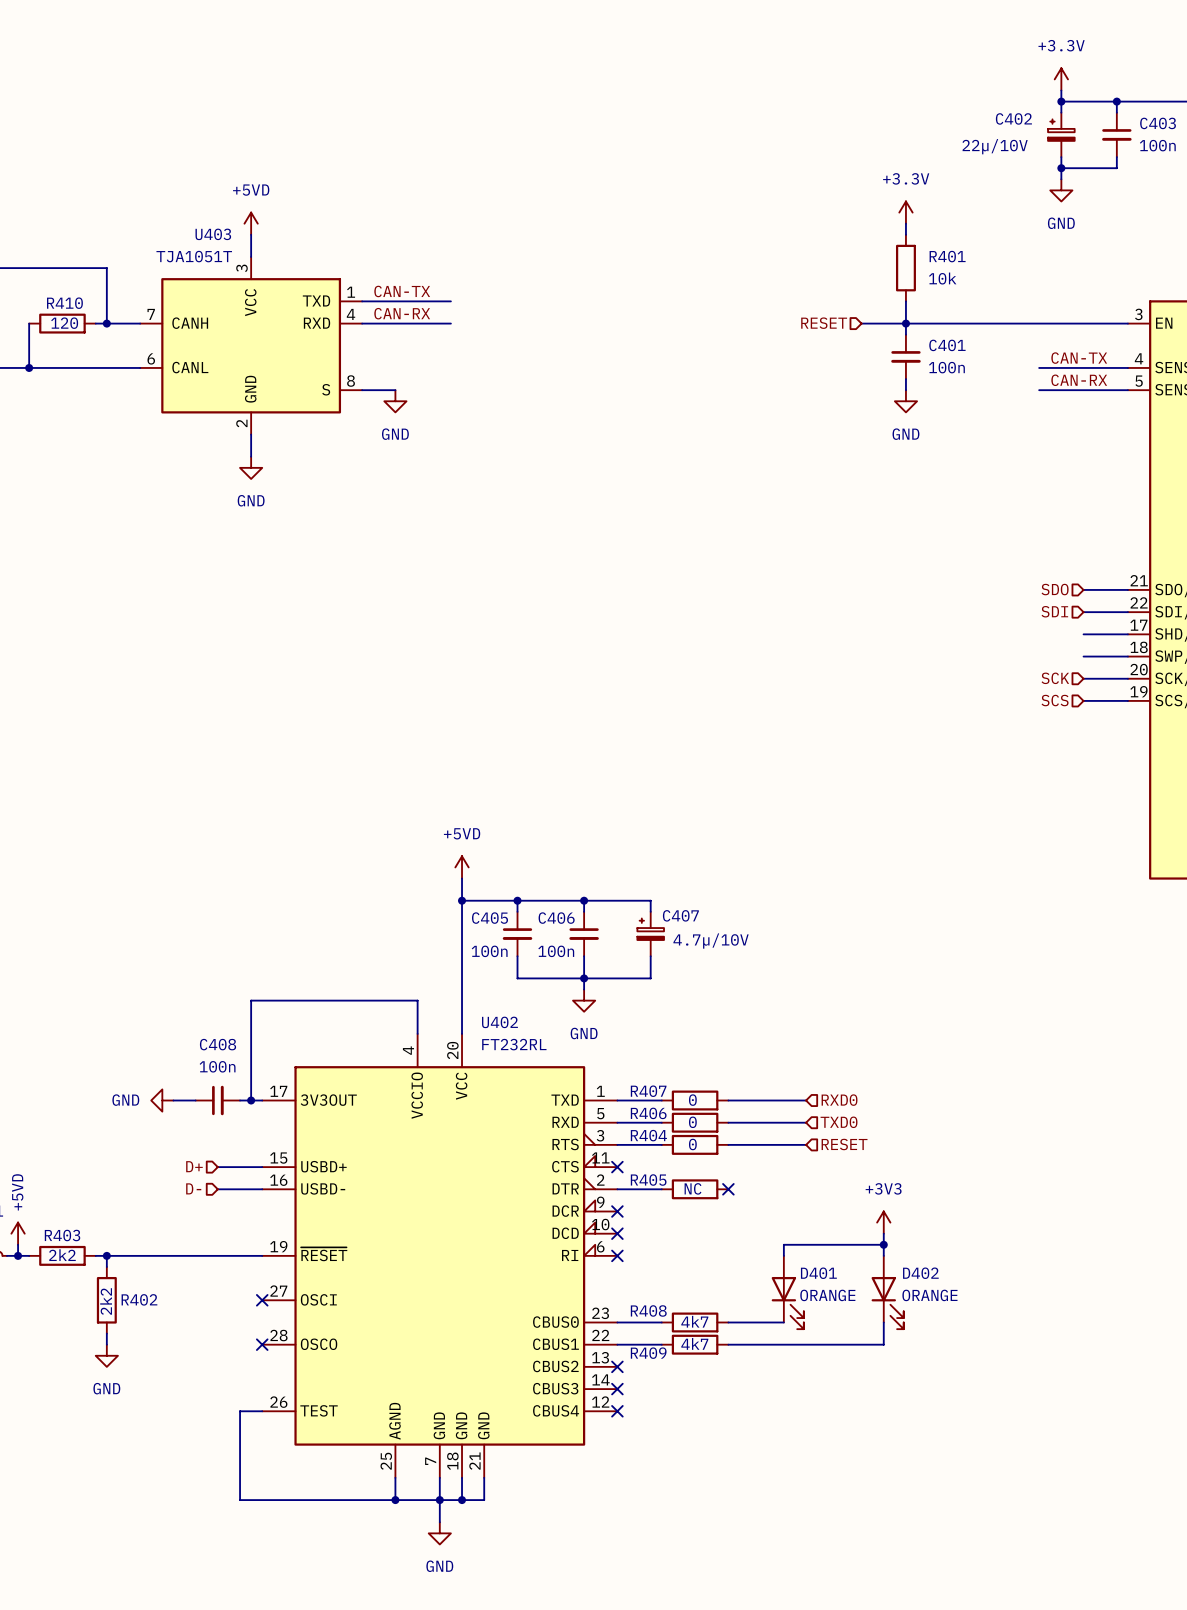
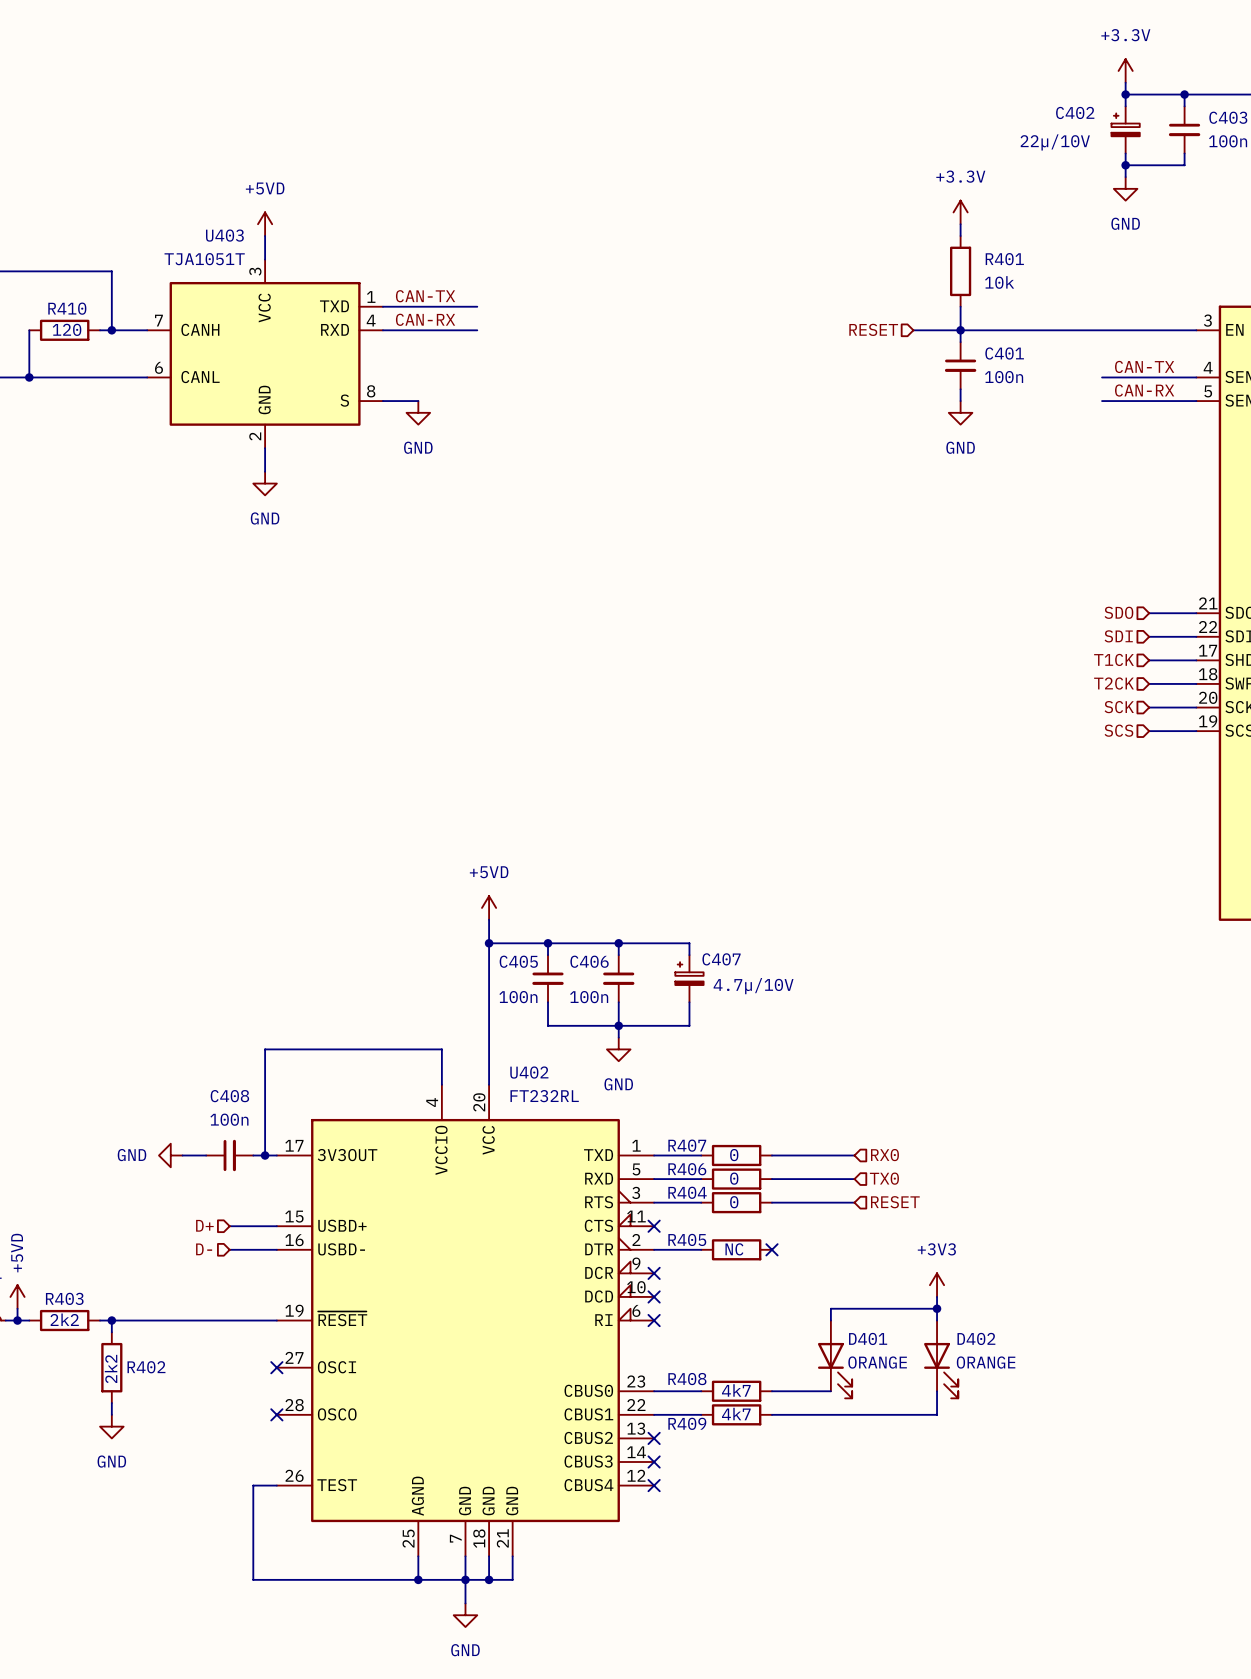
hierarchical label: none -> T1CK (1114, 659)
hierarchical label: none -> T2CK (1114, 683)
hierarchical label: RXD0 (839, 1100) -> RX0 (884, 1155)
hierarchical label: TXD0 (839, 1122) -> TX0 (884, 1178)

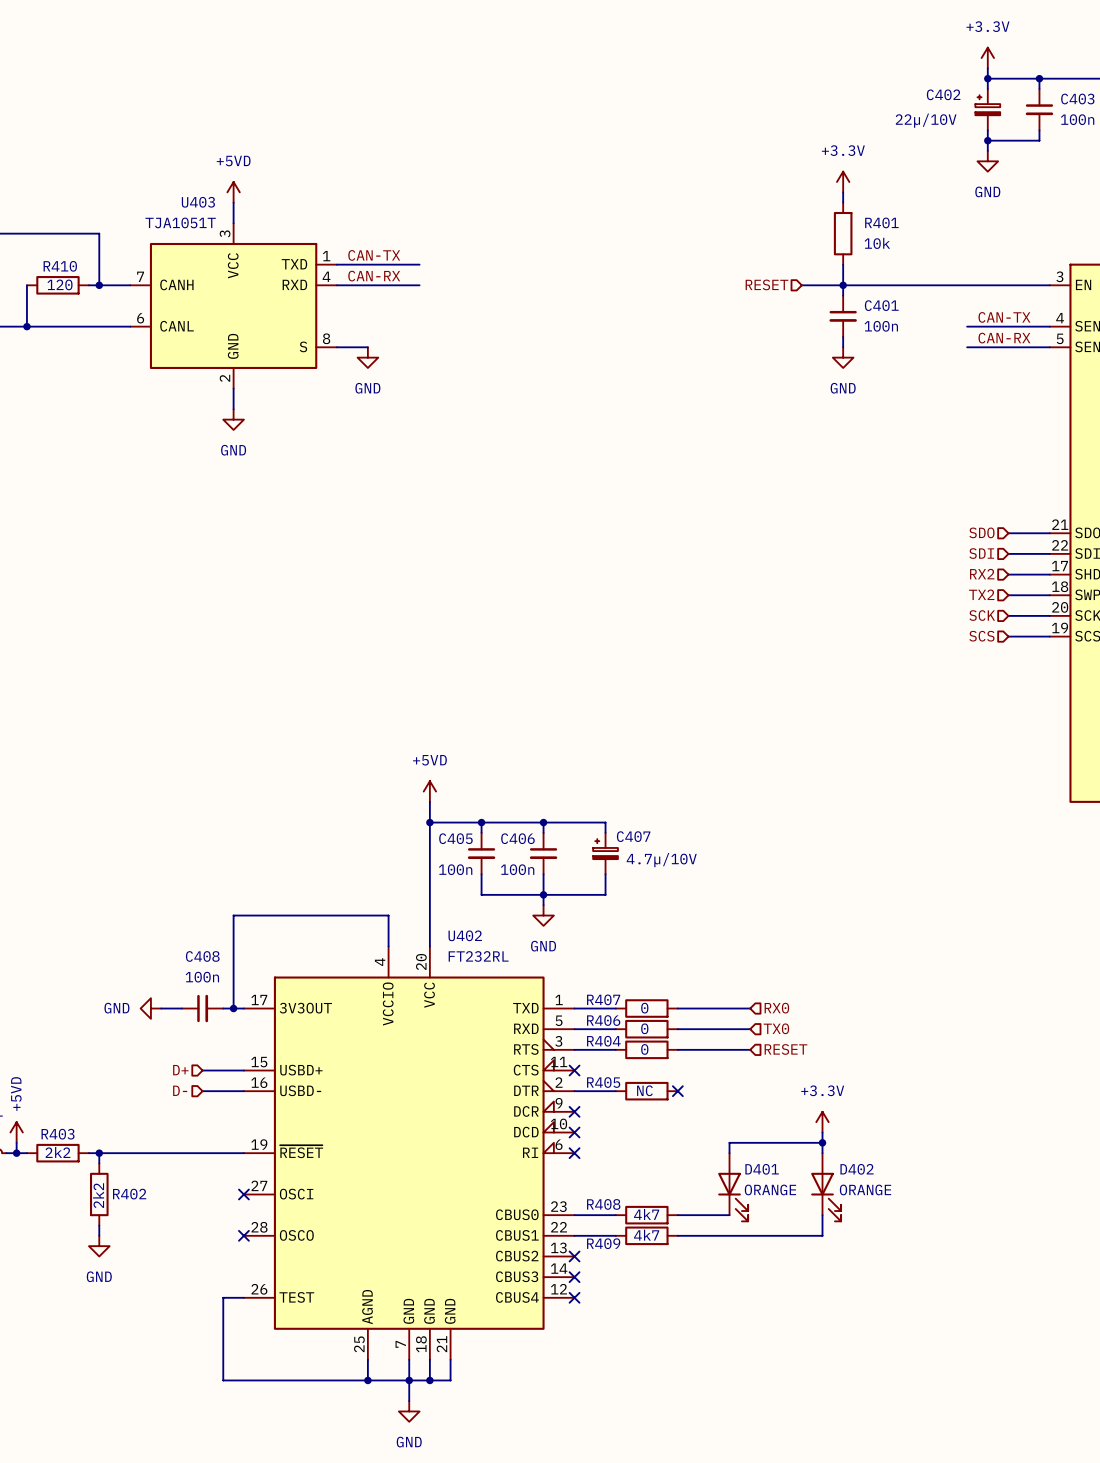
hierarchical label: T1CK (1114, 659) -> RX2 (982, 574)
hierarchical label: T2CK (1114, 683) -> TX2 (981, 594)
power symbol: +3V3 (937, 1285) -> +3.3V (822, 1122)

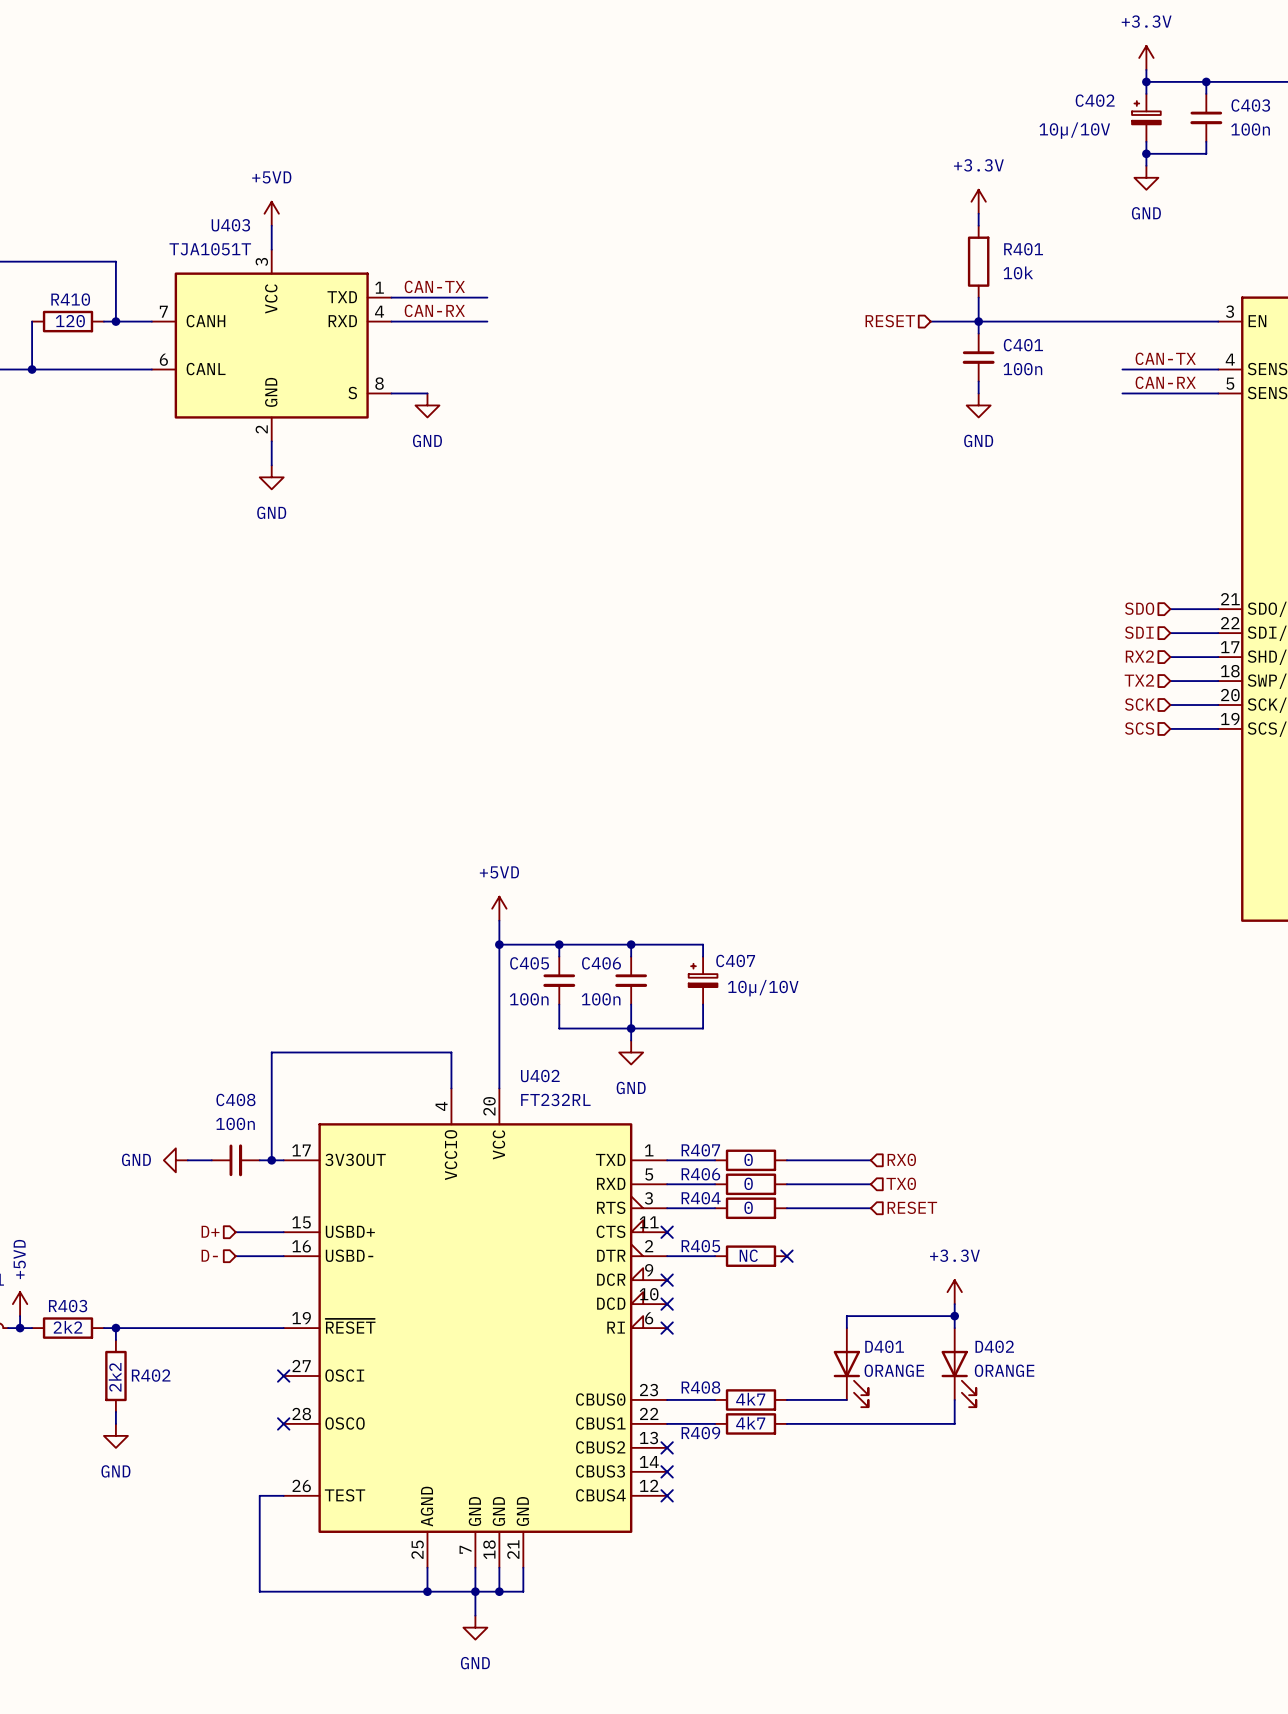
C402 value: 22µ/10V (926, 120) -> 10µ/10V (1074, 130)
C407 value: 4.7µ/10V (661, 860) -> 10µ/10V (763, 988)

